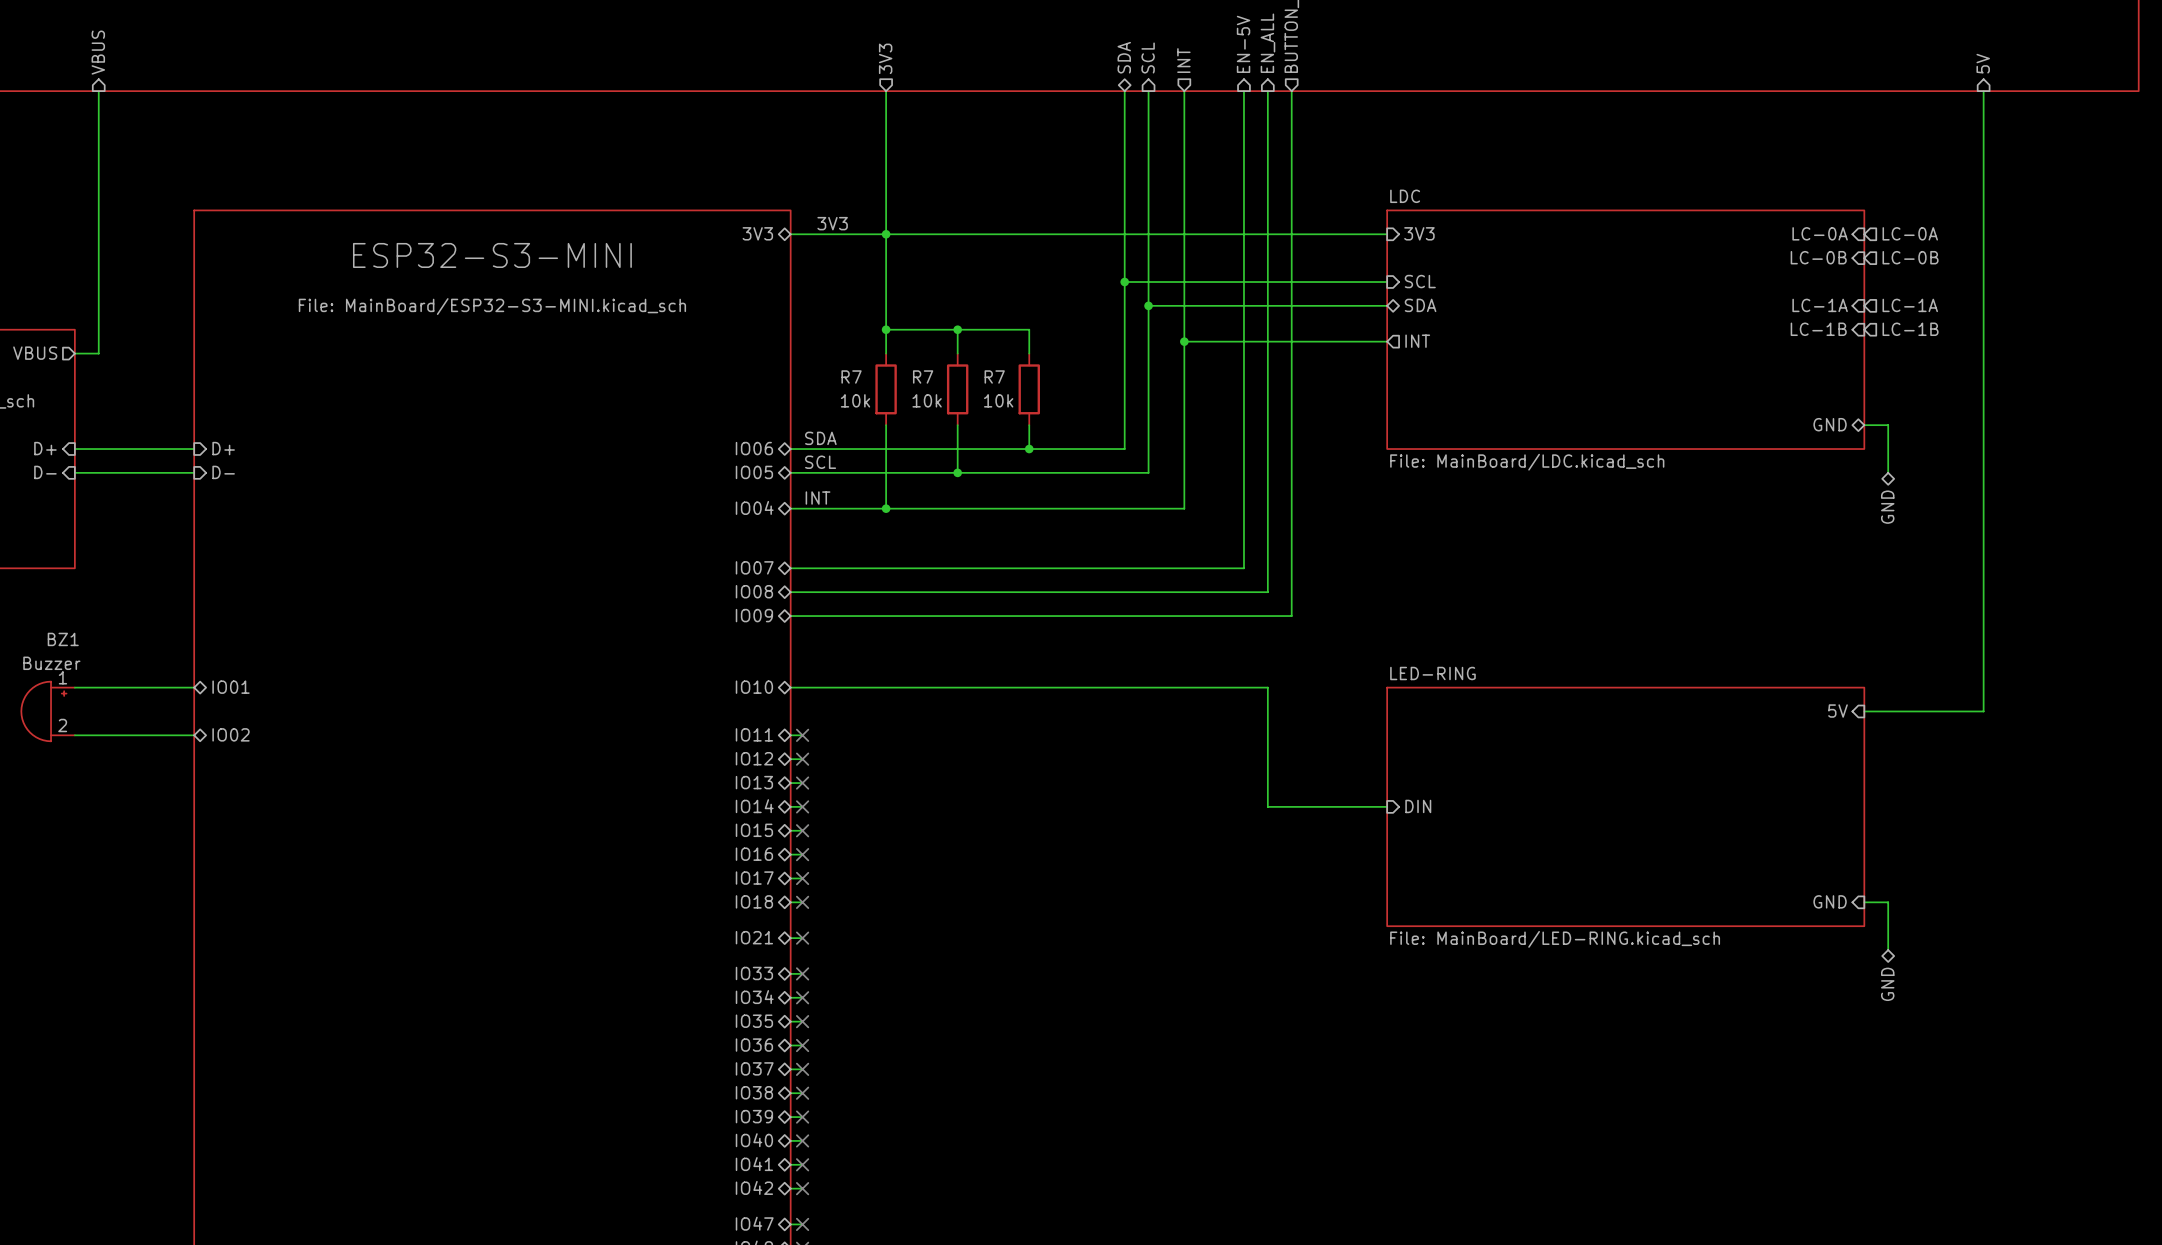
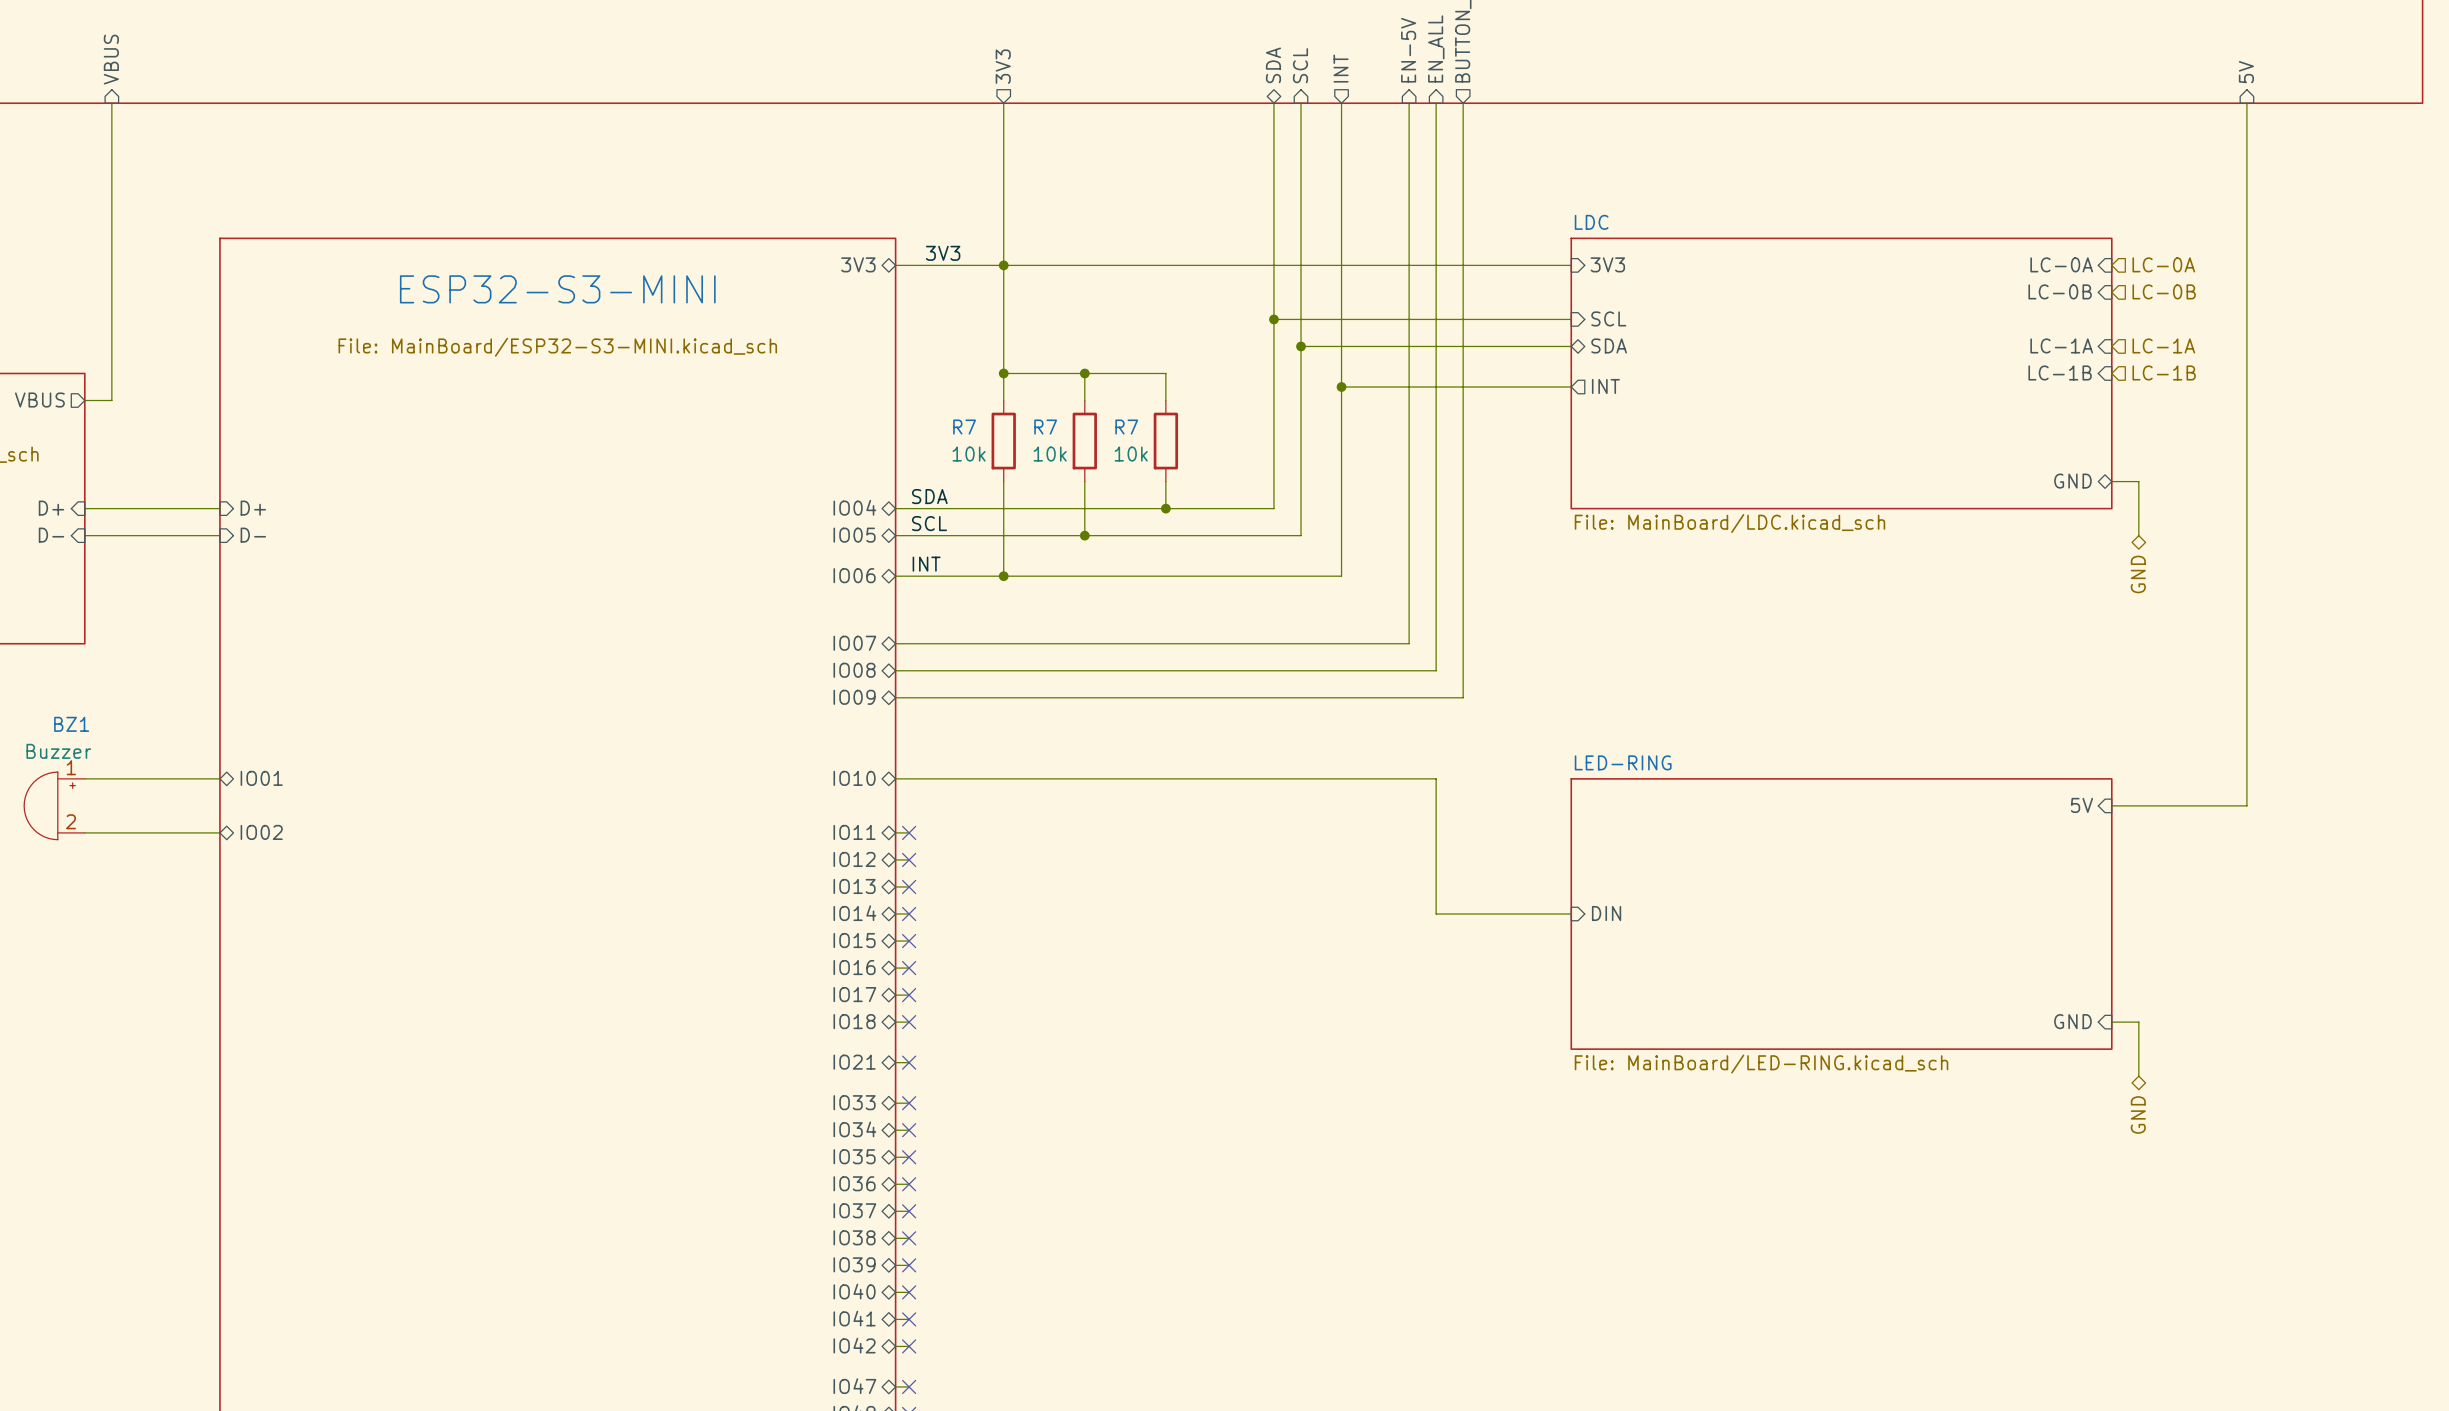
sheet pin: IO06 (754, 448) -> IO04 (854, 507)
sheet pin: IO04 (754, 507) -> IO06 (854, 575)

